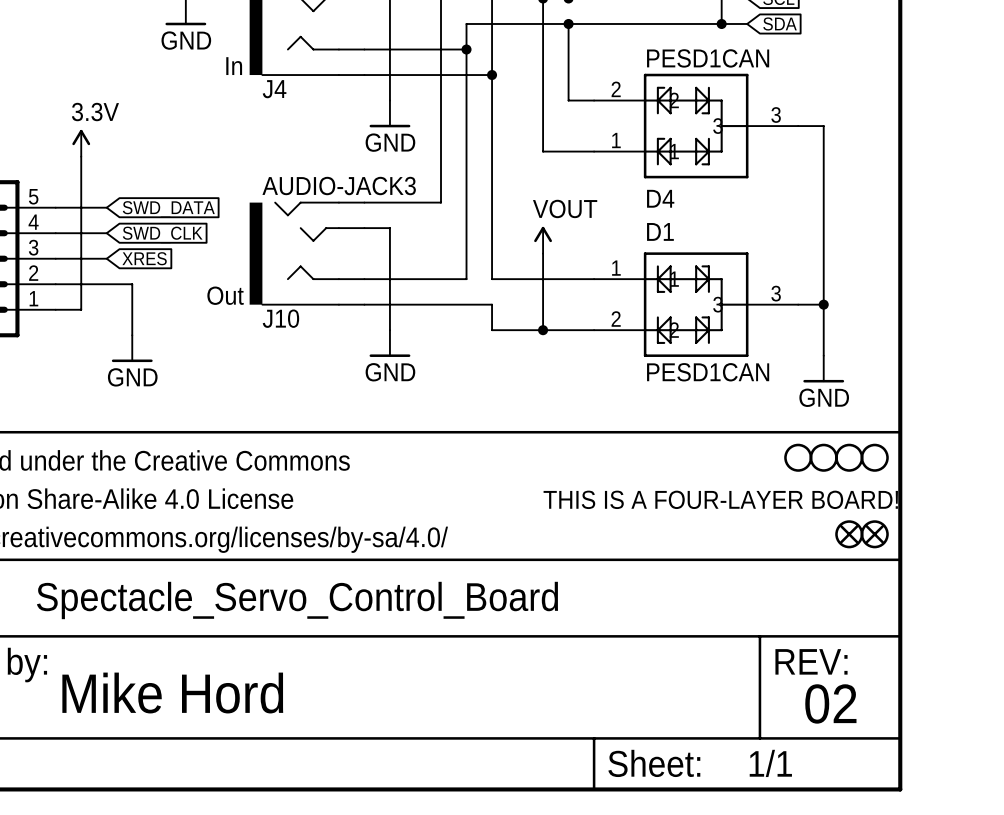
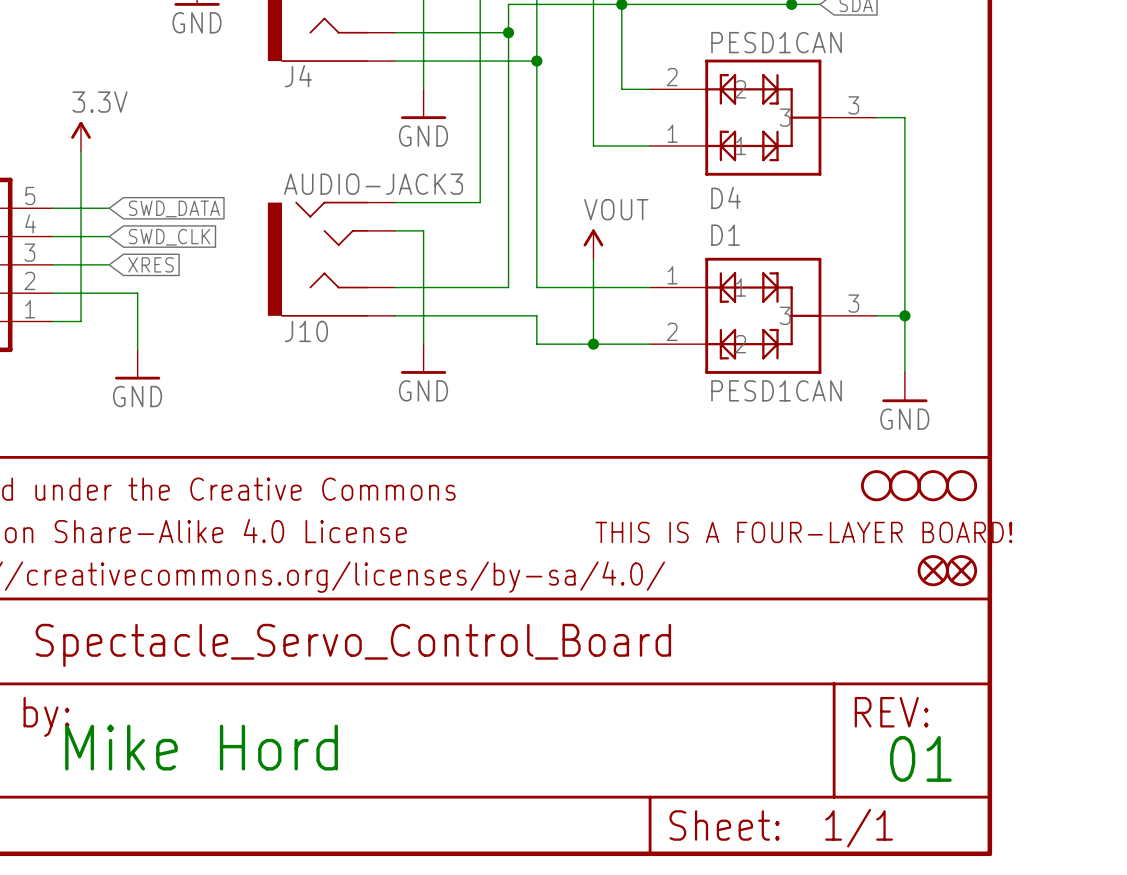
text: In (234, 66) -> none
text: Out (225, 295) -> none
text: 02 (830, 703) -> 01 (920, 758)

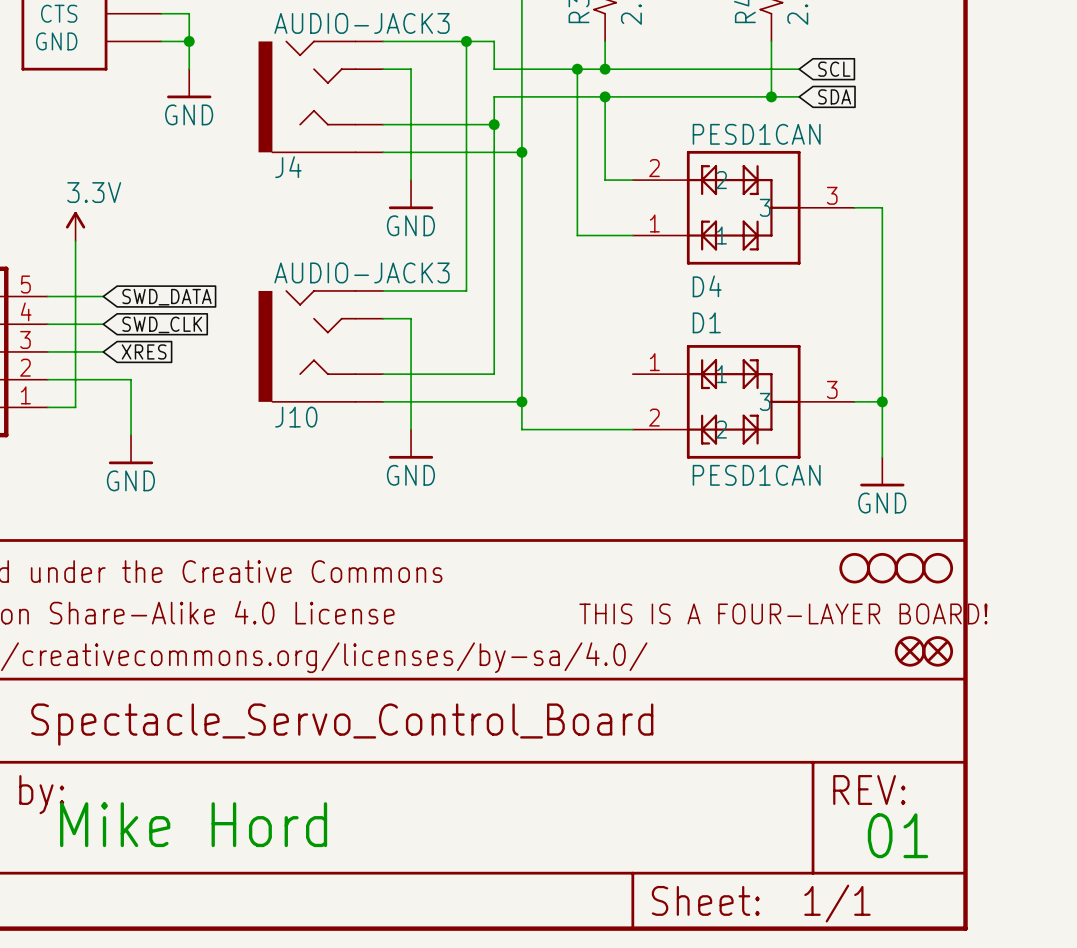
power symbol: VOUT (593, 244) -> none
wire: (593, 259) (593, 344) -> none
wire: (536, 287) (650, 287) -> (521, 374) (521, 401)
junction position: (593, 344) -> (521, 401)

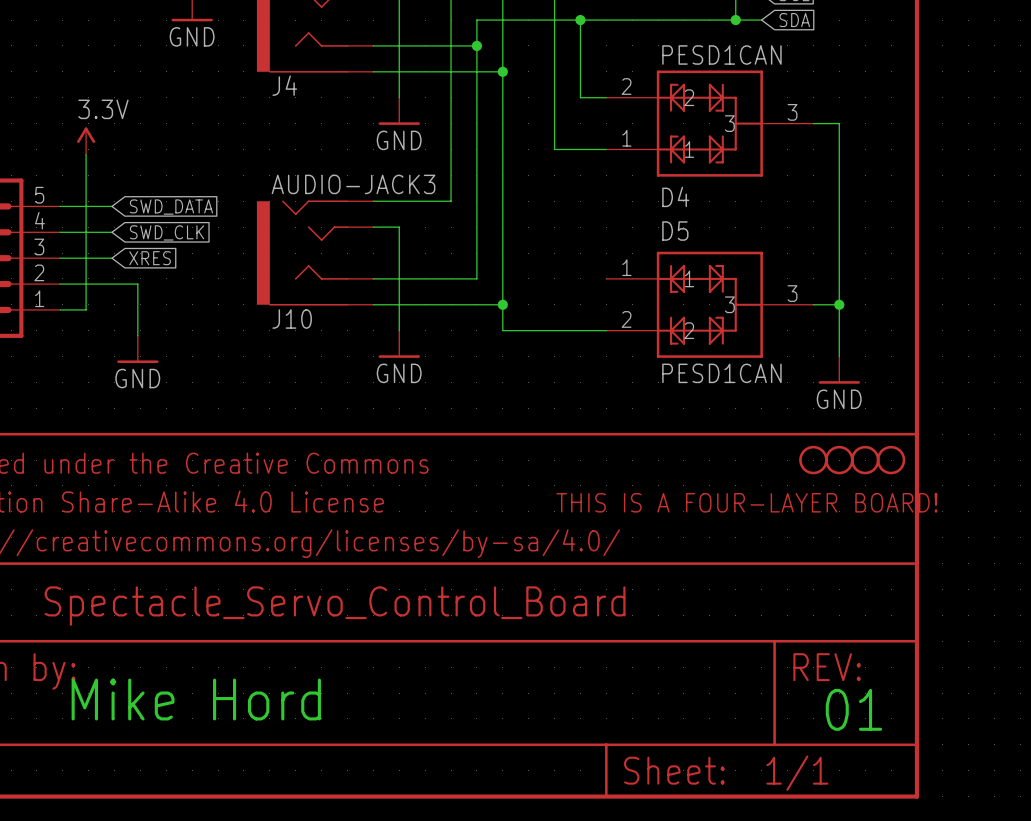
D1 name: D1 (706, 322) -> D5 (675, 231)
part: (910, 651) -> none
part: (937, 651) -> none

